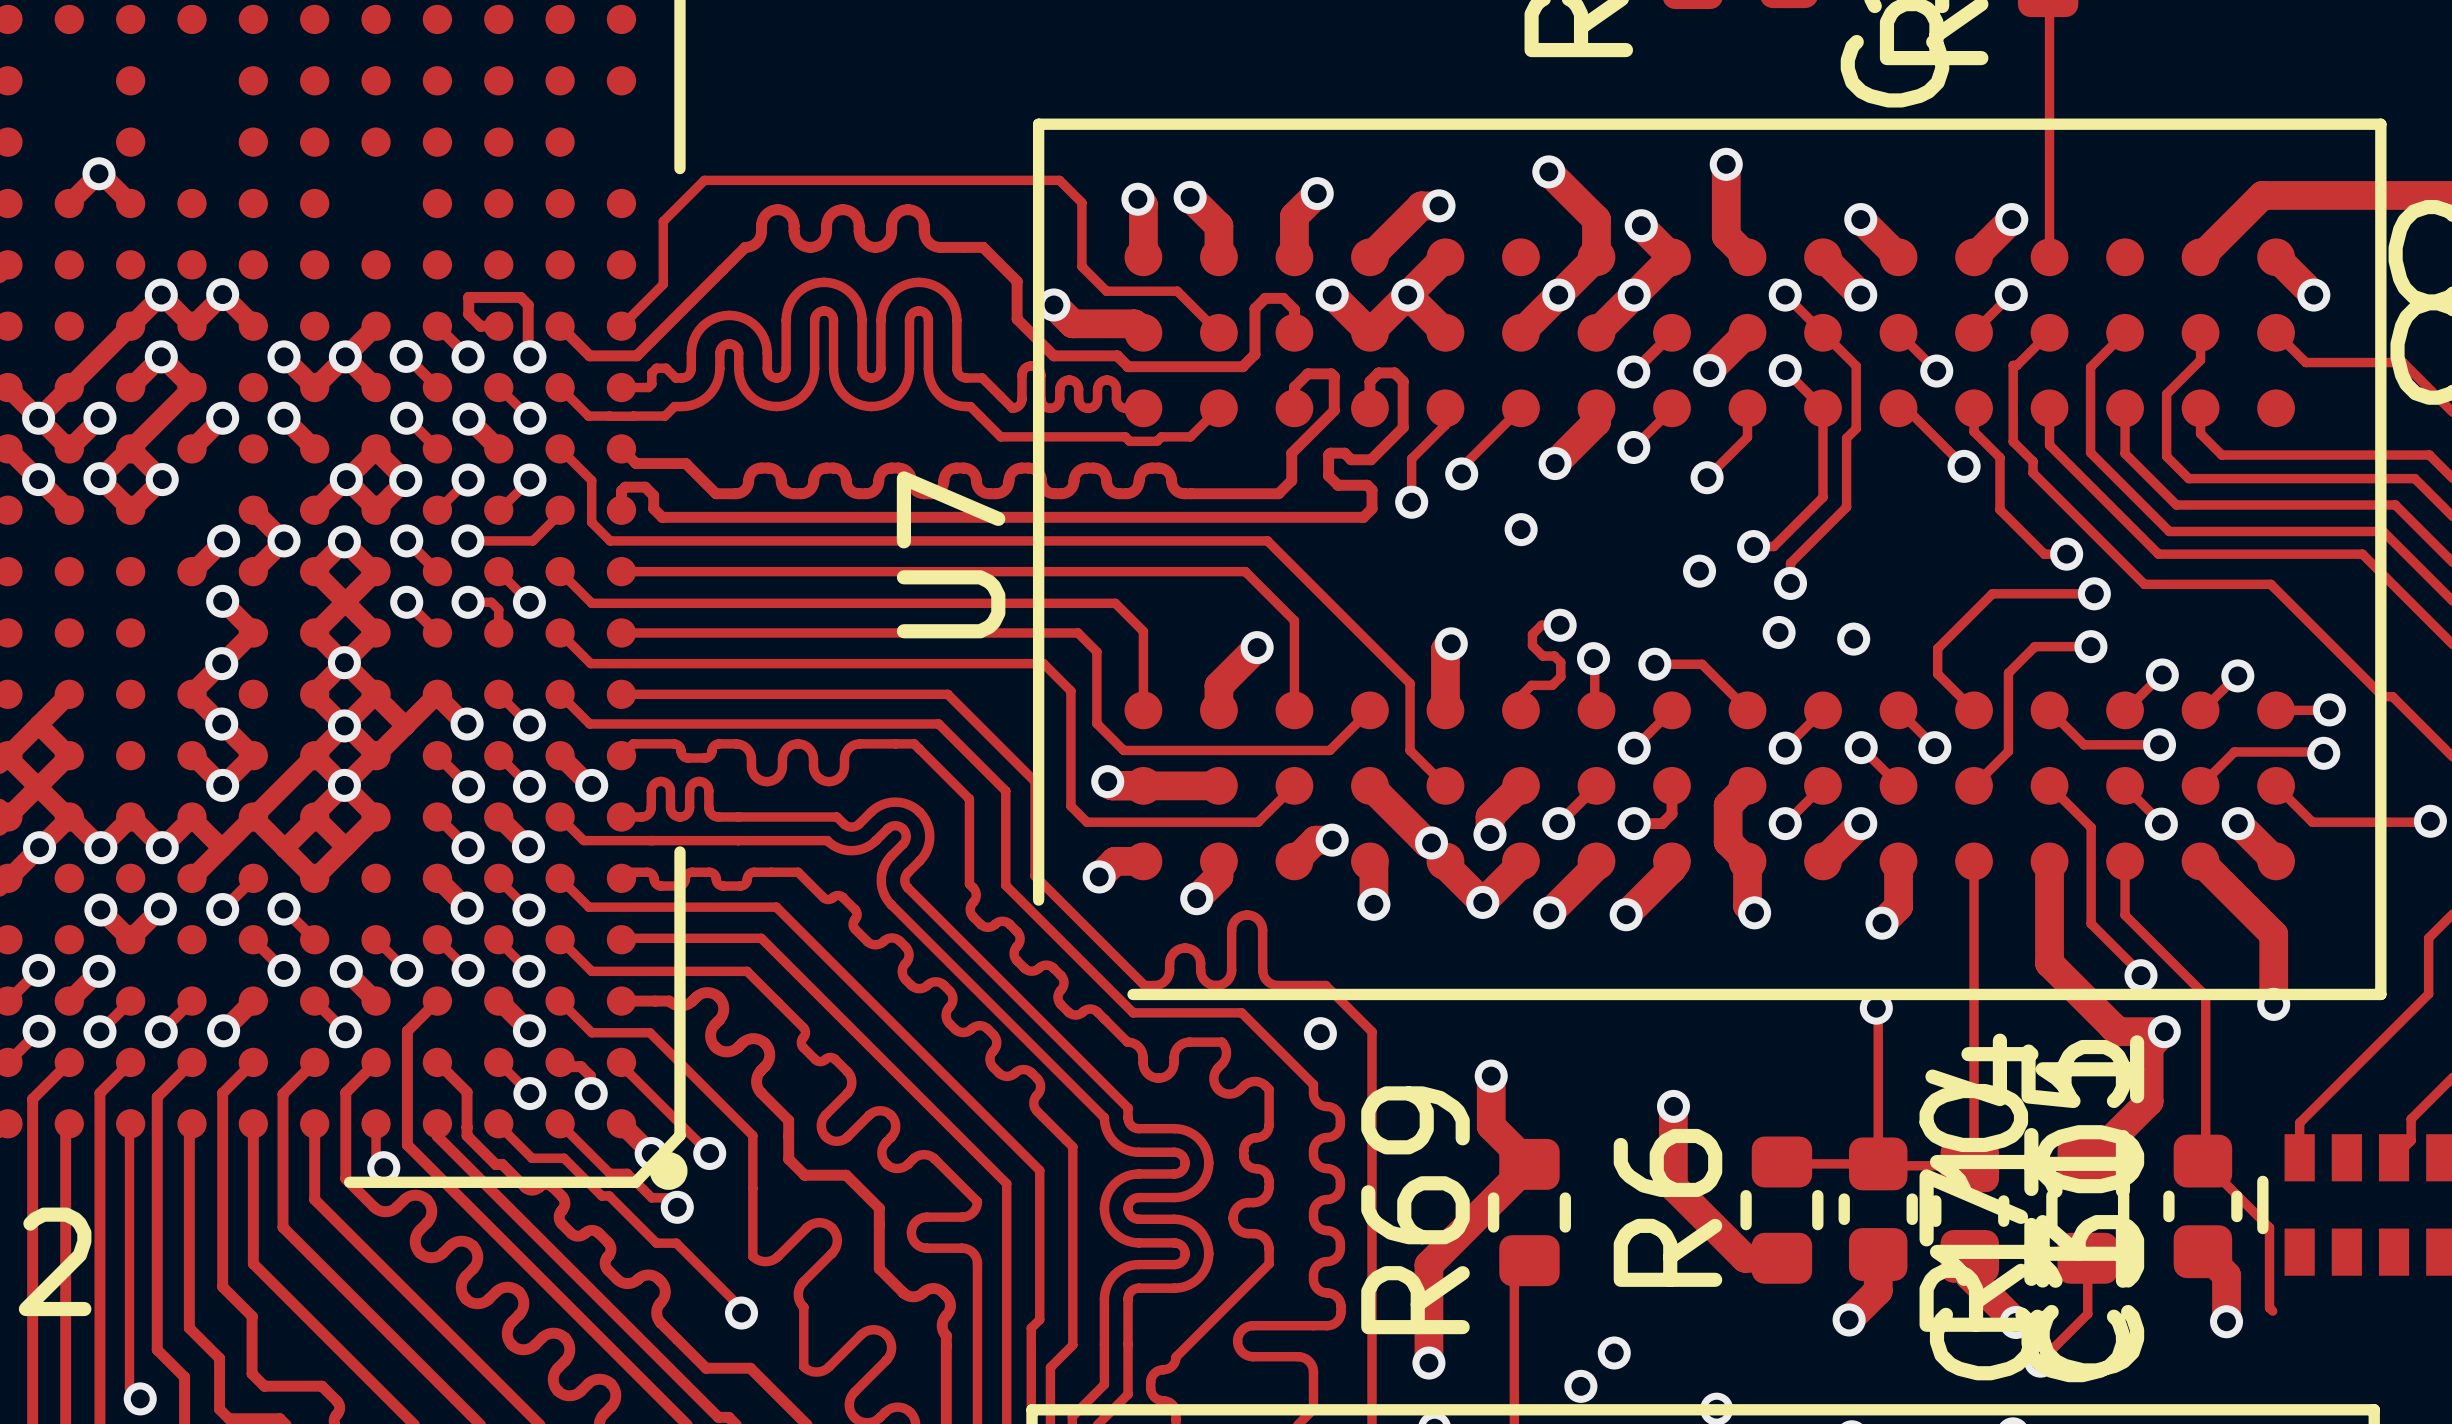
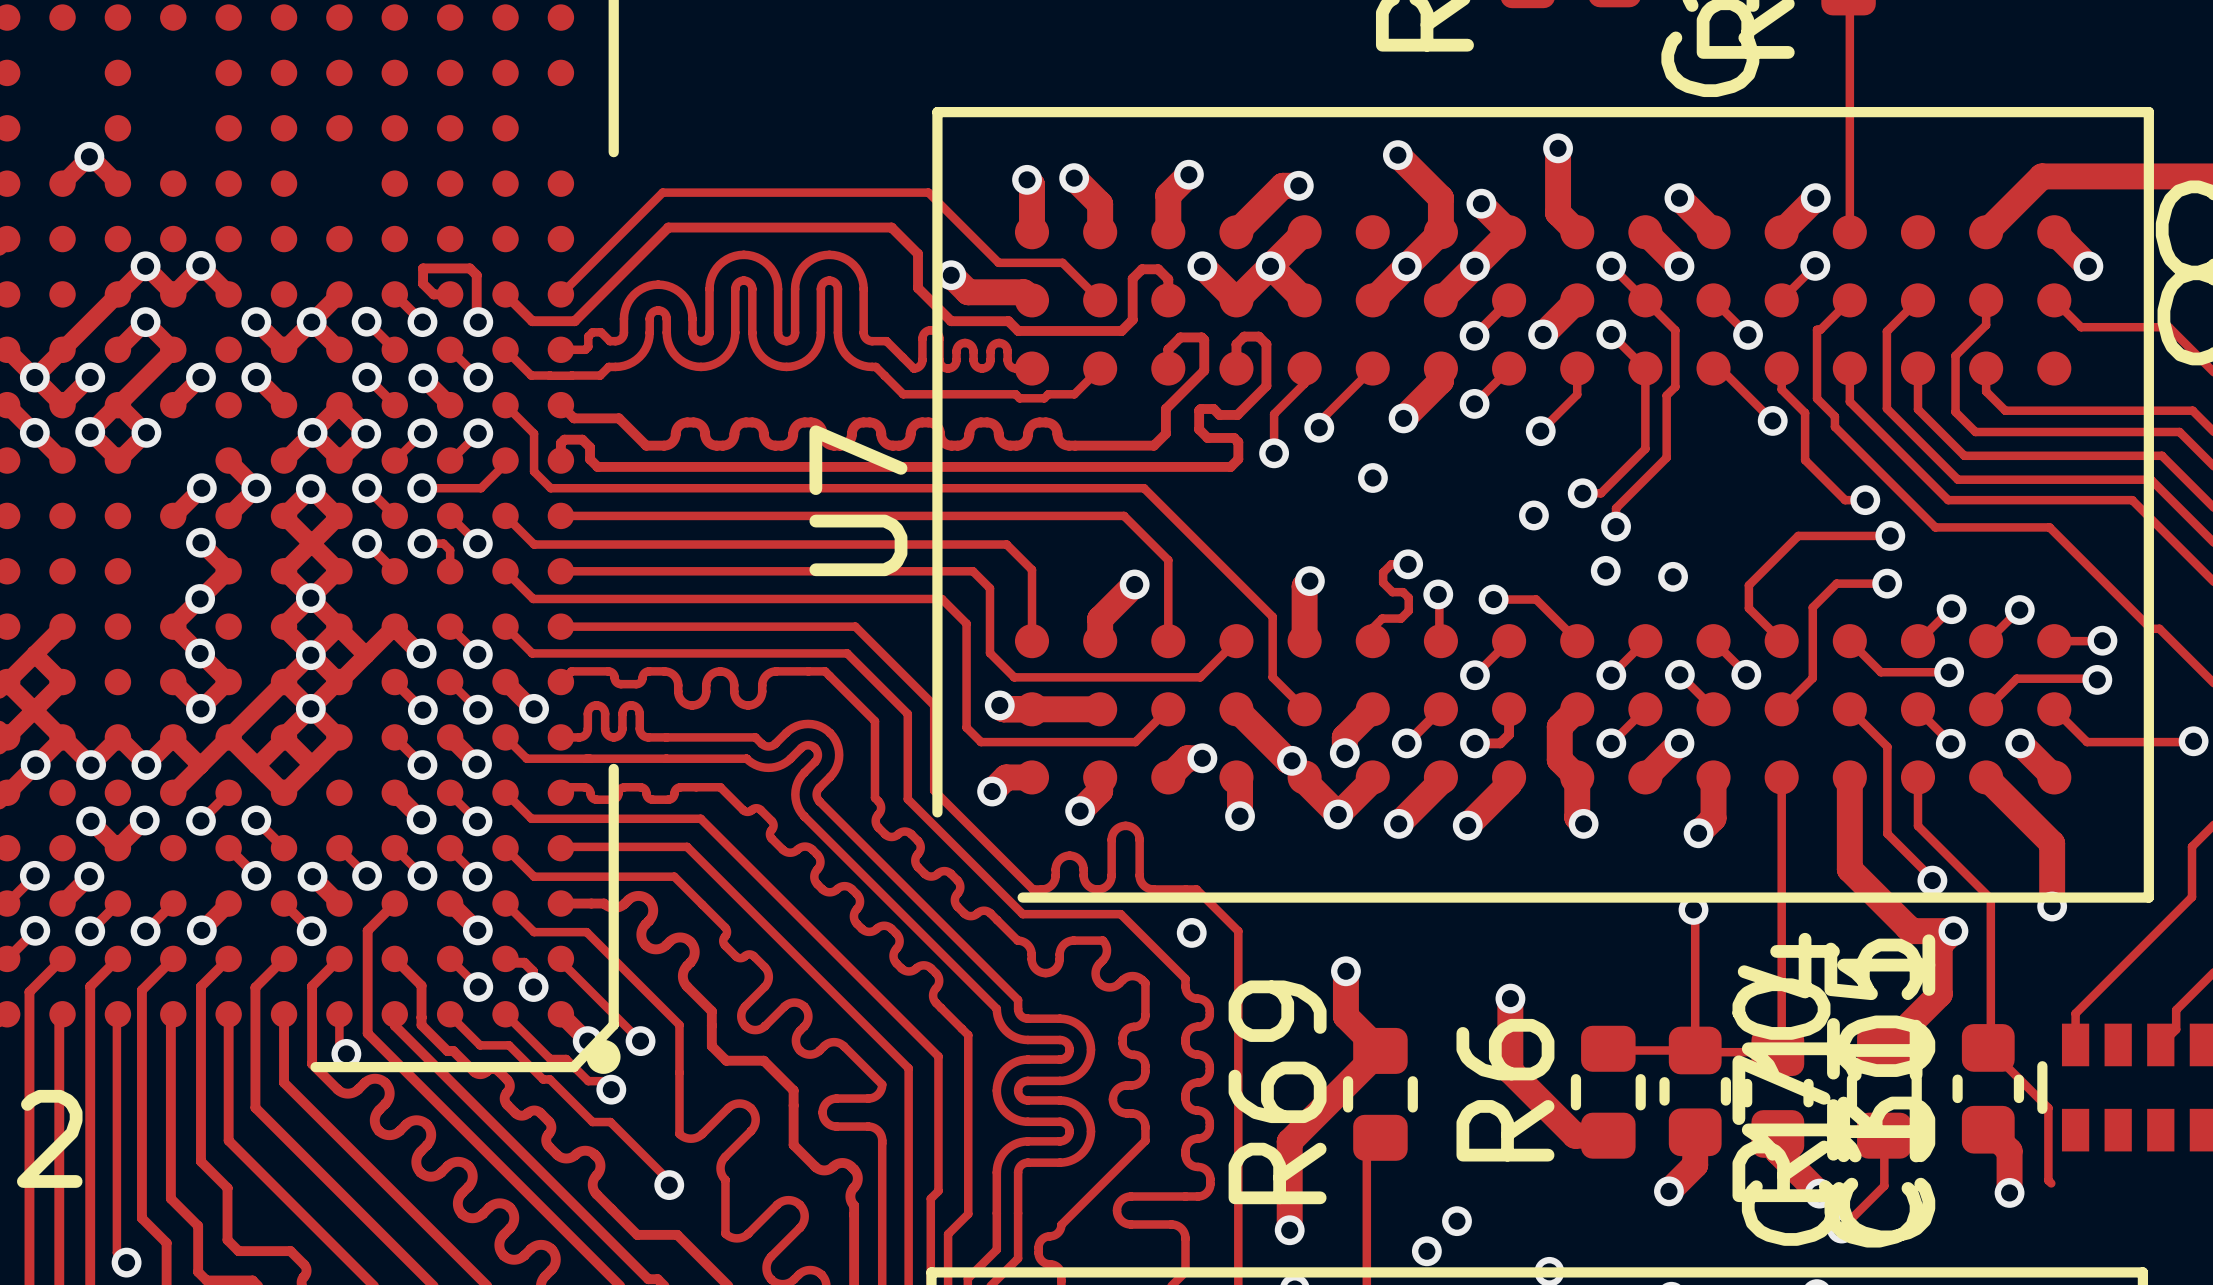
track: (740, 252) (758, 241) (760, 235) (762, 219) (771, 210) (779, 209) (789, 214) (793, 221) (796, 239) (802, 245) (810, 247) (818, 245) (824, 239) (829, 216) (836, 210) (842, 209) (849, 210) (855, 216) (861, 239) (871, 246) (879, 246) (886, 242) (891, 235) (893, 217) (899, 211) (907, 209) (914, 210) (920, 216) (923, 221) (925, 237) (932, 245) (940, 247) (983, 247) (987, 252) -> (668, 227) (891, 227)
track: (1081, 266) (1081, 202) (1059, 180) (704, 180) (663, 221) (663, 284) -> (976, 240) (928, 192) (662, 192) (598, 256)

